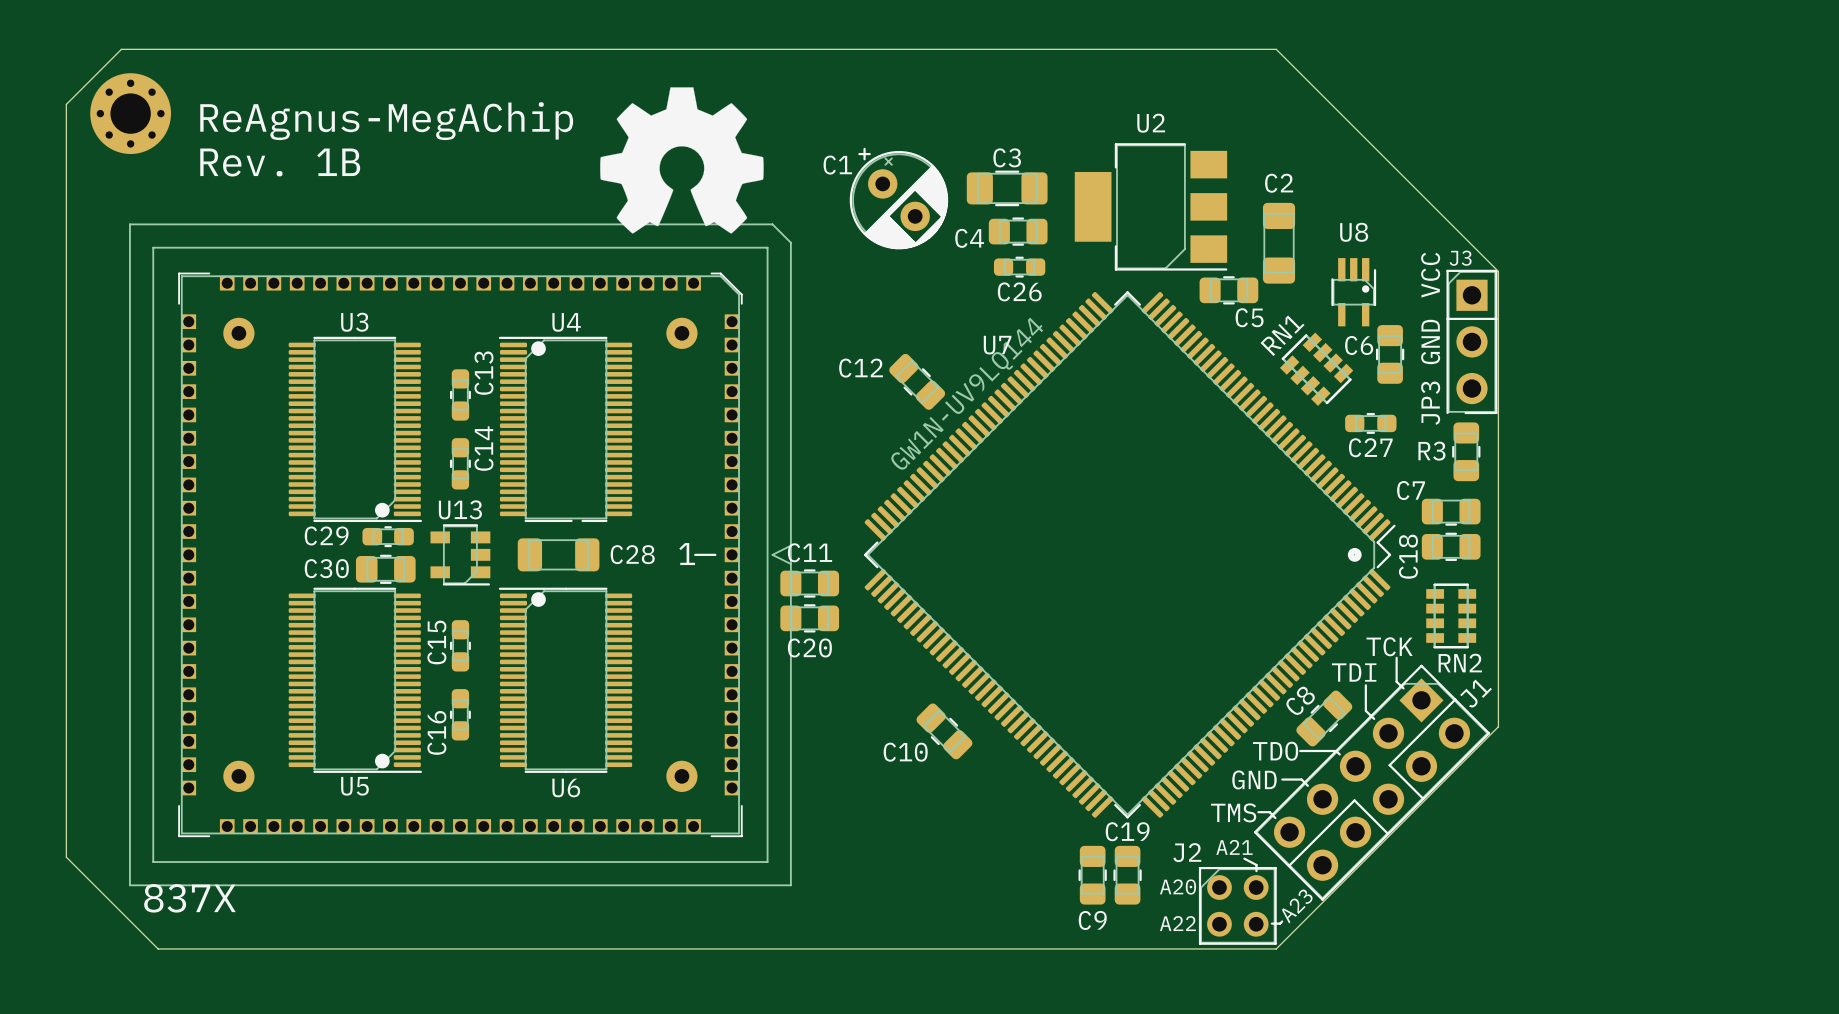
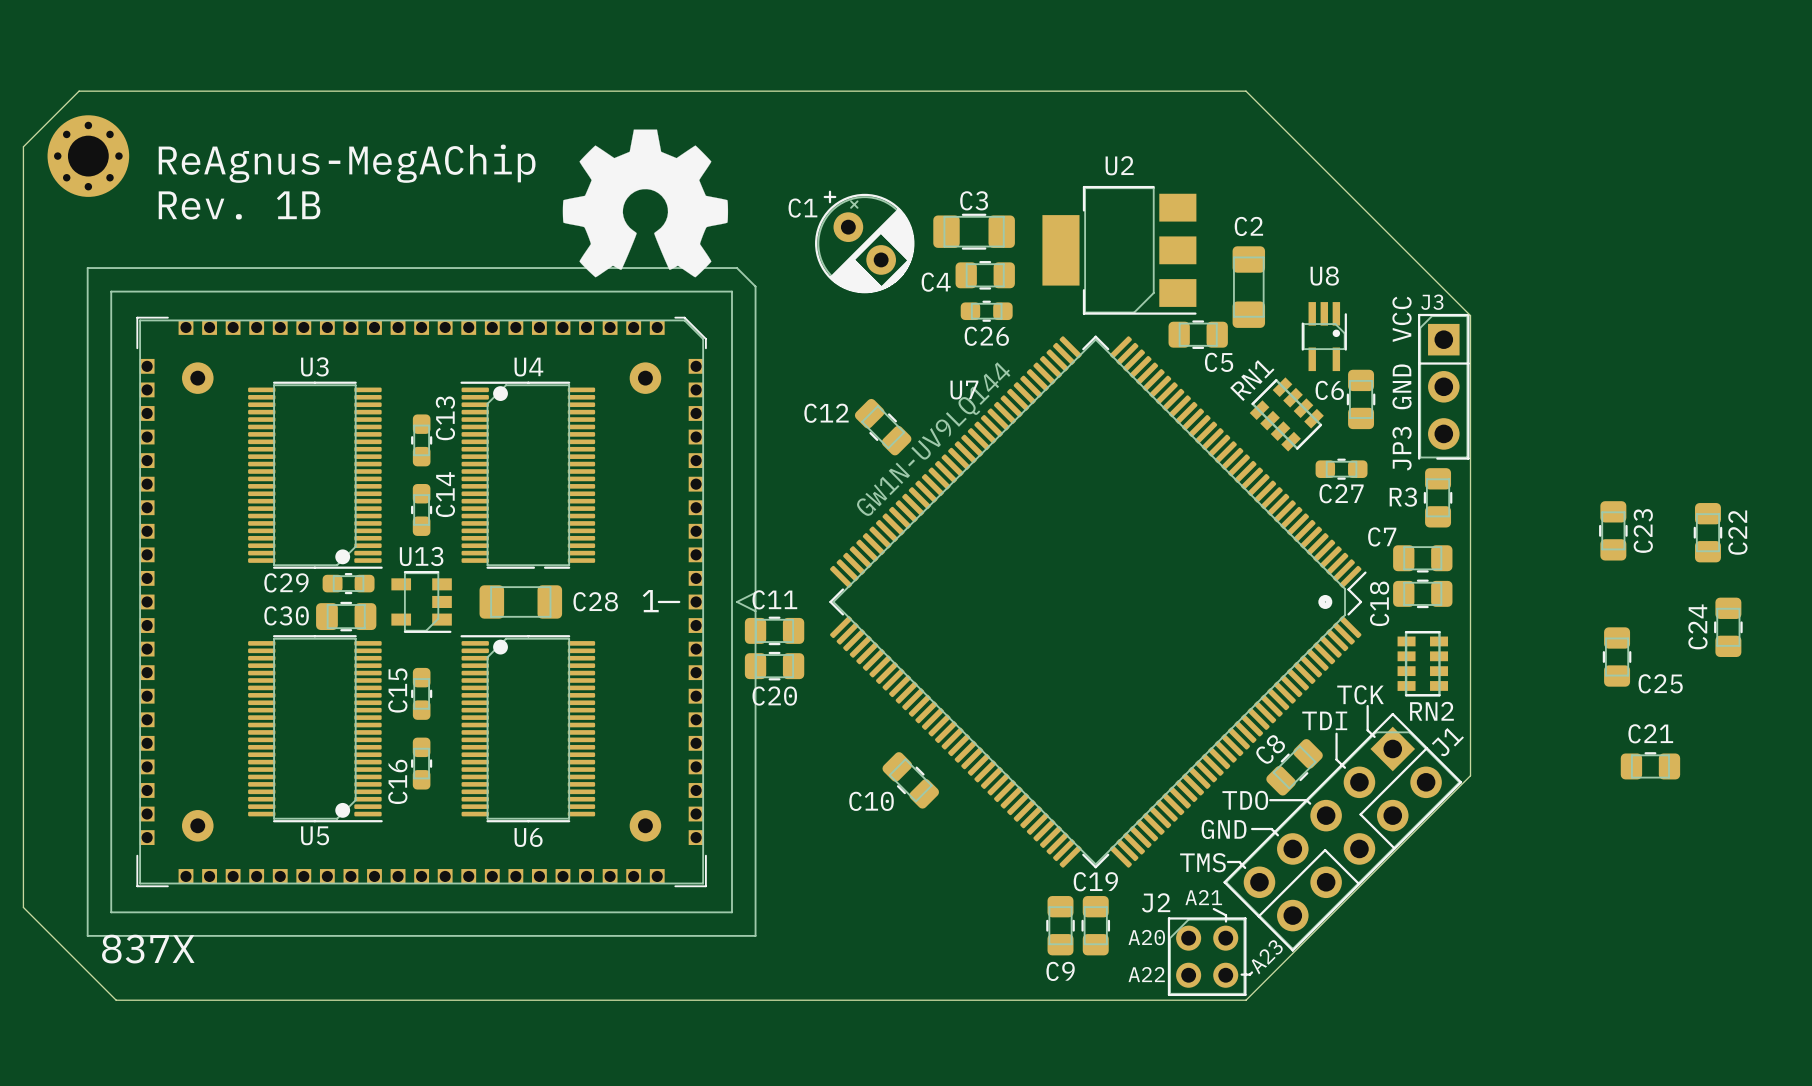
C23: none -> (1613, 530)
C22: none -> (1707, 532)
C24: none -> (1728, 627)
C25: none -> (1617, 657)
C21: none -> (1650, 765)

